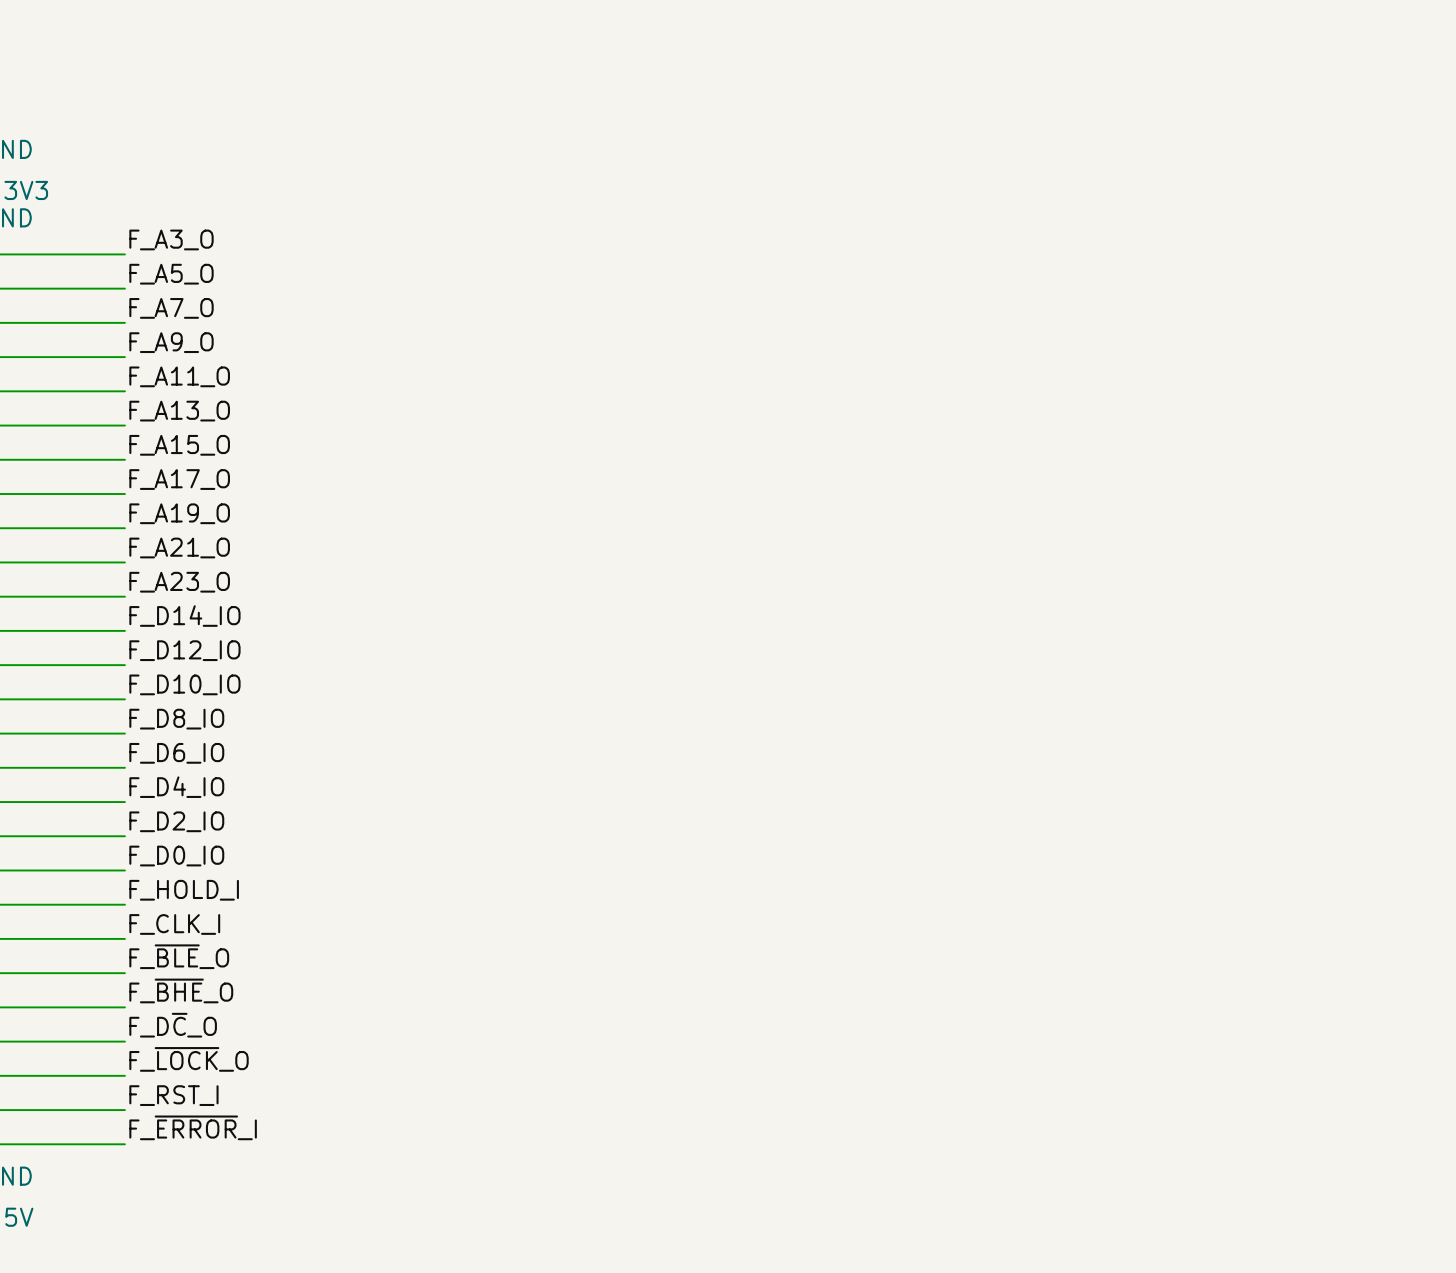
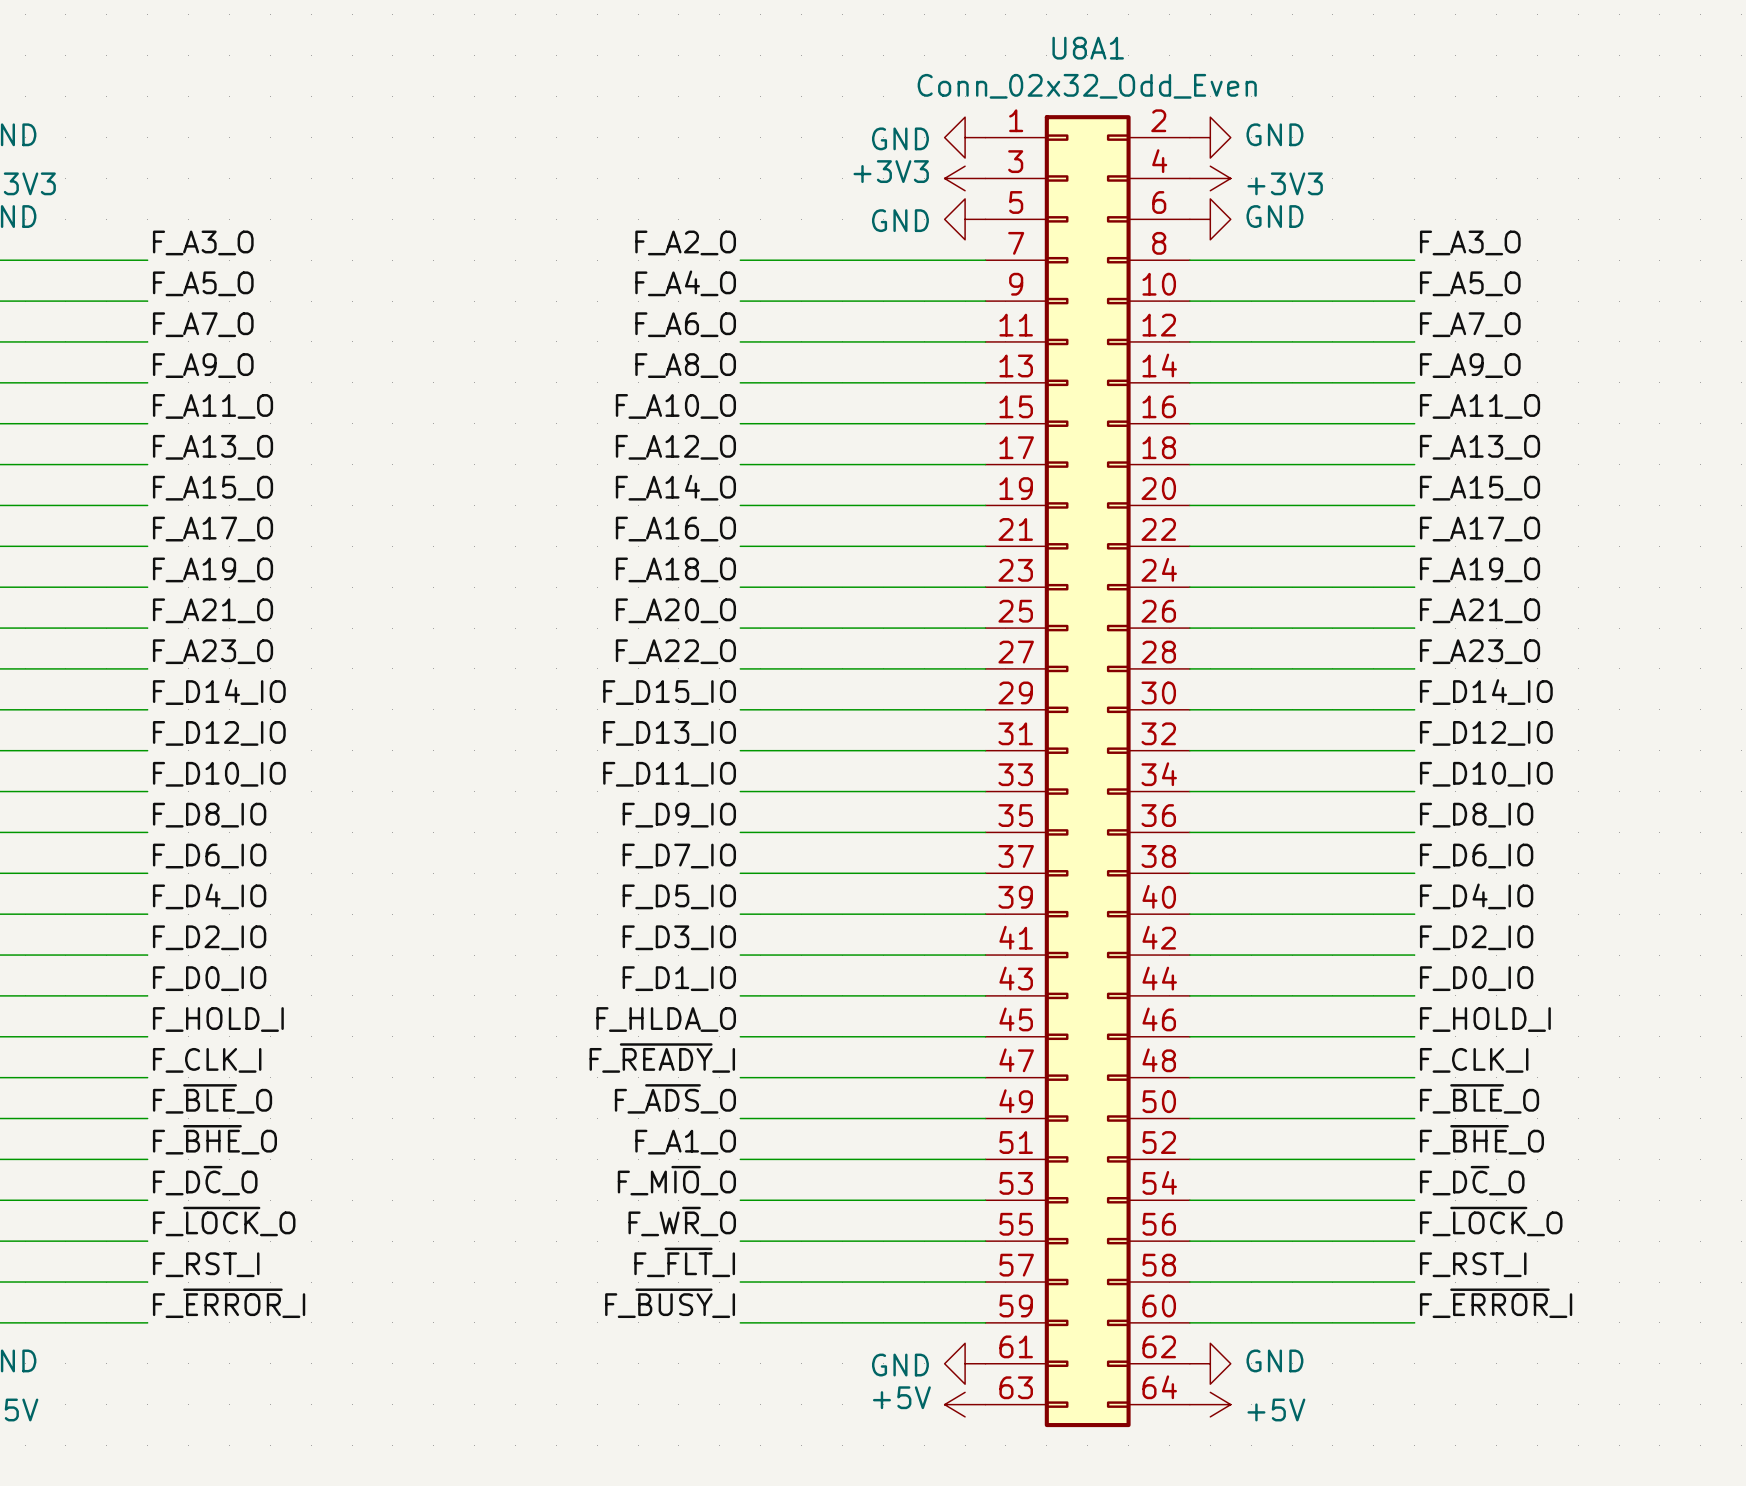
power symbol: none -> GND (965, 137)
power symbol: none -> GND (1210, 137)
power symbol: none -> +3V3 (965, 178)
power symbol: none -> +3V3 (1210, 178)
power symbol: none -> GND (965, 219)
power symbol: none -> GND (1210, 219)
label: none -> F_A2_O (685, 242)
label: none -> F_A3_O (1470, 242)
wire: none -> (740, 260) (985, 260)
wire: none -> (1189, 260) (1414, 260)
label: none -> F_A4_O (685, 283)
label: none -> F_A5_O (1470, 283)
wire: none -> (740, 301) (985, 301)
wire: none -> (1189, 301) (1414, 301)
label: none -> F_A6_O (685, 324)
label: none -> F_A7_O (1470, 324)
wire: none -> (740, 341) (985, 341)
wire: none -> (1189, 341) (1414, 341)
label: none -> F_A8_O (685, 365)
label: none -> F_A9_O (1470, 365)
wire: none -> (740, 382) (985, 382)
wire: none -> (1189, 382) (1414, 382)
label: none -> F_A10_O (675, 406)
label: none -> F_A11_O (1480, 406)
wire: none -> (740, 423) (985, 423)
wire: none -> (1189, 423) (1414, 423)
label: none -> F_A12_O (675, 447)
label: none -> F_A13_O (1480, 447)
wire: none -> (740, 464) (985, 464)
wire: none -> (1189, 464) (1414, 464)
label: none -> F_A14_O (675, 487)
label: none -> F_A15_O (1480, 488)
wire: none -> (740, 505) (985, 505)
wire: none -> (1189, 505) (1414, 505)
label: none -> F_A16_O (675, 529)
label: none -> F_A17_O (1480, 529)
wire: none -> (740, 546) (985, 546)
wire: none -> (1189, 546) (1414, 546)
label: none -> F_A18_O (675, 569)
label: none -> F_A19_O (1480, 569)
wire: none -> (740, 587) (985, 587)
wire: none -> (1189, 587) (1414, 587)
label: none -> F_A20_O (675, 610)
label: none -> F_A21_O (1480, 610)
wire: none -> (740, 628) (985, 628)
wire: none -> (1189, 628) (1414, 628)
label: none -> F_A22_O (675, 651)
label: none -> F_A23_O (1480, 651)
wire: none -> (740, 668) (985, 668)
wire: none -> (1189, 668) (1414, 668)
label: none -> F_D15_IO (669, 692)
label: none -> F_D14_IO (1486, 692)
wire: none -> (740, 709) (985, 709)
wire: none -> (1189, 709) (1414, 709)
label: none -> F_D13_IO (669, 733)
label: none -> F_D12_IO (1486, 733)
wire: none -> (740, 750) (985, 750)
wire: none -> (1189, 750) (1414, 750)
U8A1: none -> Conn_02x32_Odd_Even (1087, 771)
label: none -> F_D11_IO (669, 774)
label: none -> F_D10_IO (1486, 774)
wire: none -> (740, 791) (985, 791)
wire: none -> (1189, 791) (1414, 791)
label: none -> F_D9_IO (679, 815)
label: none -> F_D8_IO (1476, 815)
wire: none -> (740, 832) (985, 832)
wire: none -> (1189, 832) (1414, 832)
label: none -> F_D7_IO (679, 856)
label: none -> F_D6_IO (1476, 856)
wire: none -> (740, 873) (985, 873)
wire: none -> (1189, 873) (1414, 873)
label: none -> F_D5_IO (679, 896)
label: none -> F_D4_IO (1476, 896)
wire: none -> (740, 914) (985, 914)
wire: none -> (1189, 914) (1414, 914)
label: none -> F_D3_IO (679, 937)
label: none -> F_D2_IO (1476, 937)
wire: none -> (740, 955) (985, 955)
wire: none -> (1189, 955) (1414, 955)
label: none -> F_D1_IO (679, 978)
label: none -> F_D0_IO (1476, 978)
wire: none -> (740, 995) (985, 995)
wire: none -> (1189, 995) (1414, 995)
label: none -> F_HLDA_O (666, 1019)
label: none -> F_HOLD_I (1485, 1019)
wire: none -> (740, 1036) (985, 1036)
wire: none -> (1189, 1036) (1414, 1036)
label: none -> F_~{READY}_I (662, 1058)
label: none -> F_CLK_I (1474, 1060)
wire: none -> (740, 1077) (985, 1077)
wire: none -> (1189, 1077) (1414, 1077)
label: none -> F_~{ADS}_O (675, 1098)
label: none -> F_~{BLE}_O (1479, 1098)
wire: none -> (740, 1118) (985, 1118)
wire: none -> (1189, 1118) (1414, 1118)
label: none -> F_~{BHE}_O (1481, 1139)
label: none -> F_A1_O (685, 1142)
wire: none -> (740, 1159) (985, 1159)
wire: none -> (1189, 1159) (1414, 1159)
label: none -> F_M~{IO}_O (676, 1180)
label: none -> F_D~{C}_O (1472, 1180)
wire: none -> (740, 1200) (985, 1200)
wire: none -> (1189, 1200) (1414, 1200)
label: none -> F_W~{R}_O (682, 1221)
label: none -> F_~{LOCK}_O (1491, 1221)
wire: none -> (740, 1241) (985, 1241)
wire: none -> (1189, 1241) (1414, 1241)
label: none -> F_~{FLT}_I (684, 1262)
label: none -> F_RST_I (1473, 1264)
wire: none -> (740, 1282) (985, 1282)
wire: none -> (1189, 1282) (1414, 1282)
label: none -> F_~{BUSY}_I (670, 1303)
label: none -> F_~{ERROR}_I (1496, 1303)
wire: none -> (740, 1322) (985, 1322)
wire: none -> (1189, 1322) (1414, 1322)
power symbol: none -> GND (965, 1363)
power symbol: none -> GND (1210, 1363)
power symbol: none -> +5V (965, 1404)
power symbol: none -> +5V (1210, 1404)

